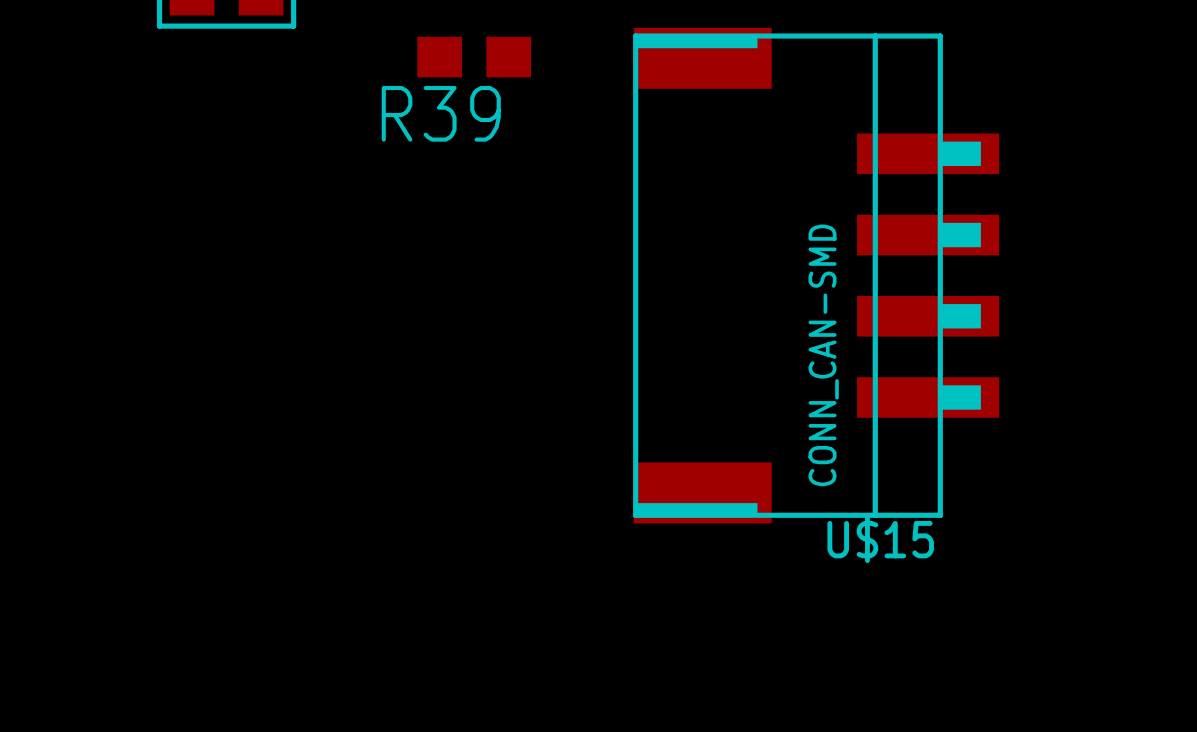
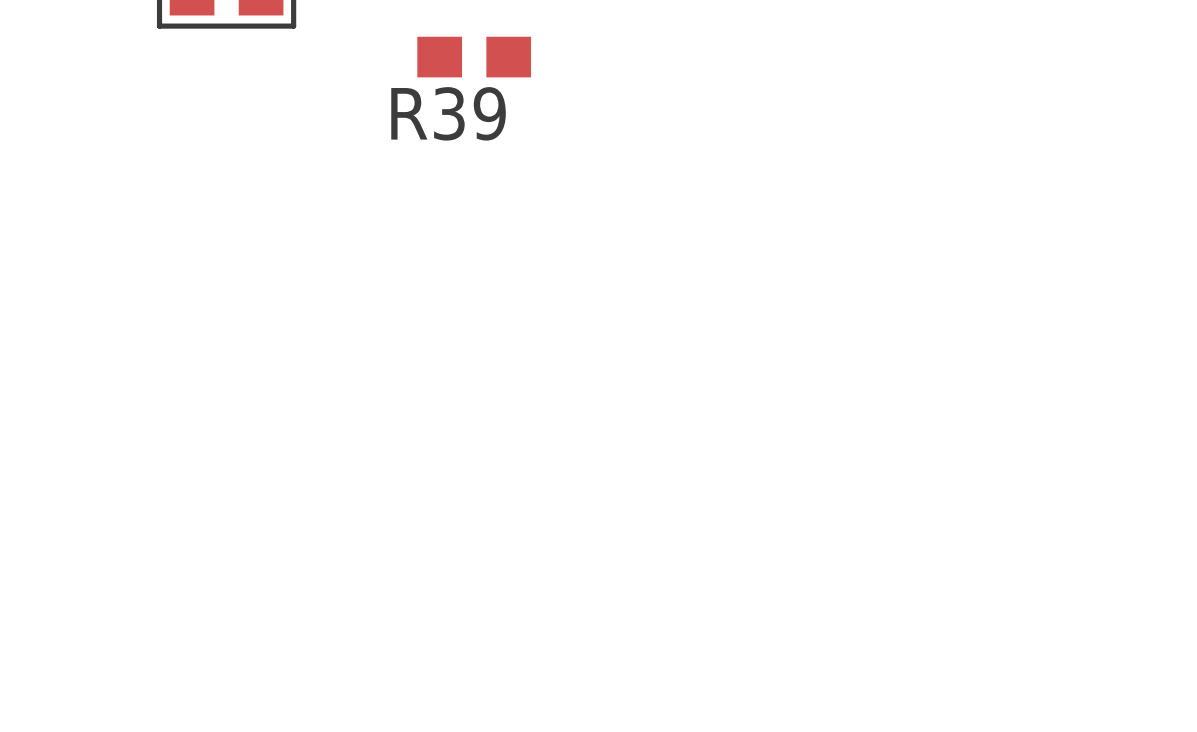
U$15: CONN_CAN-SMD (816, 275) -> none

